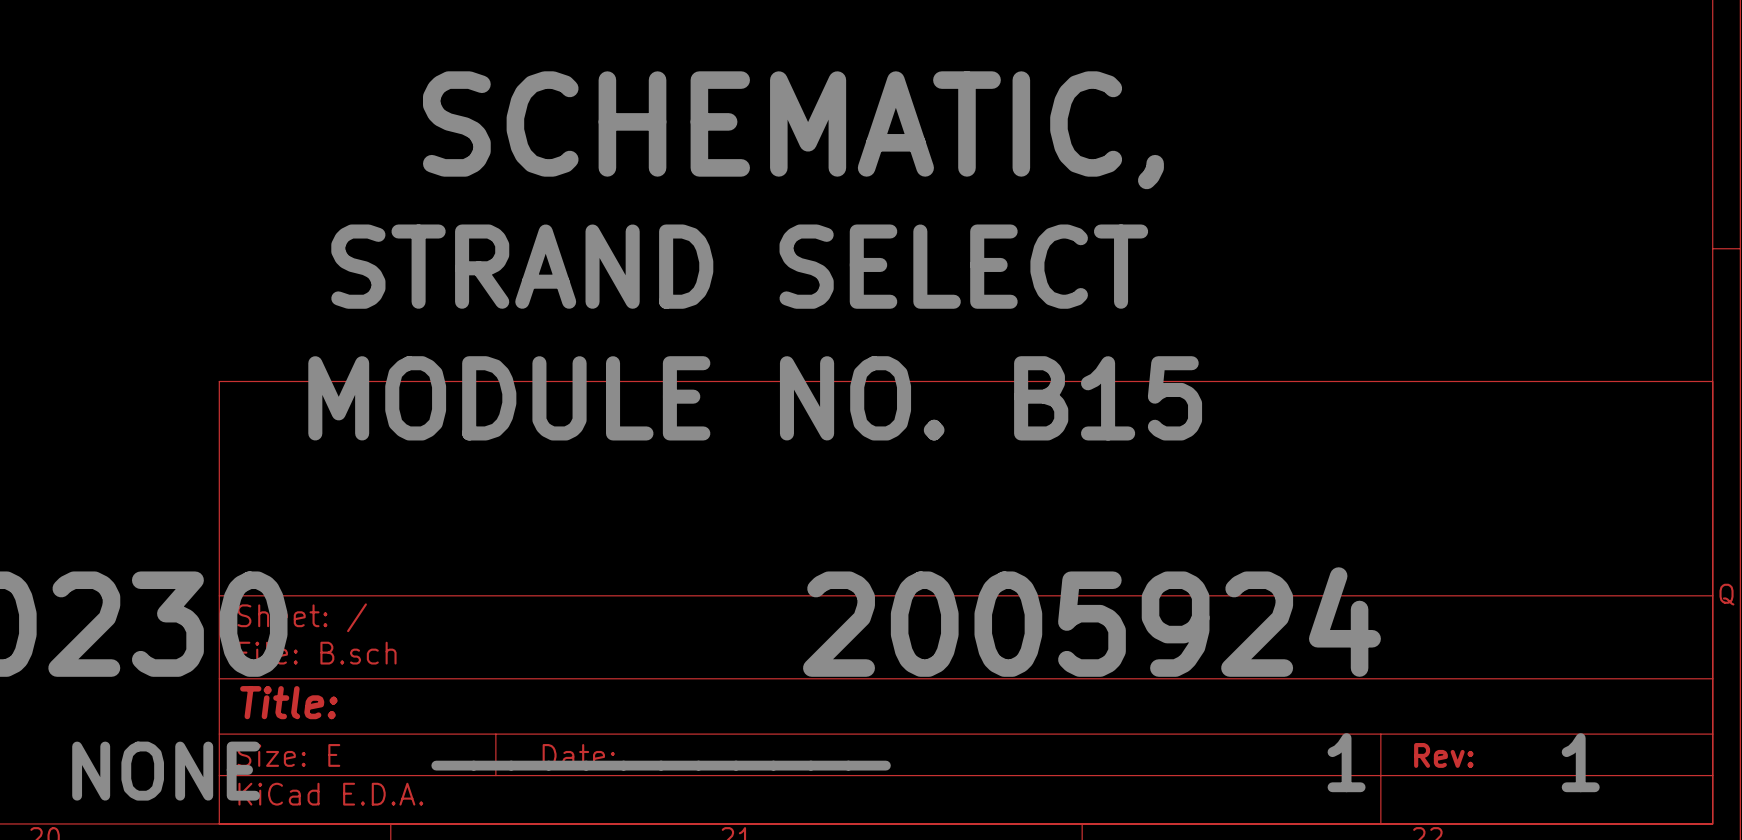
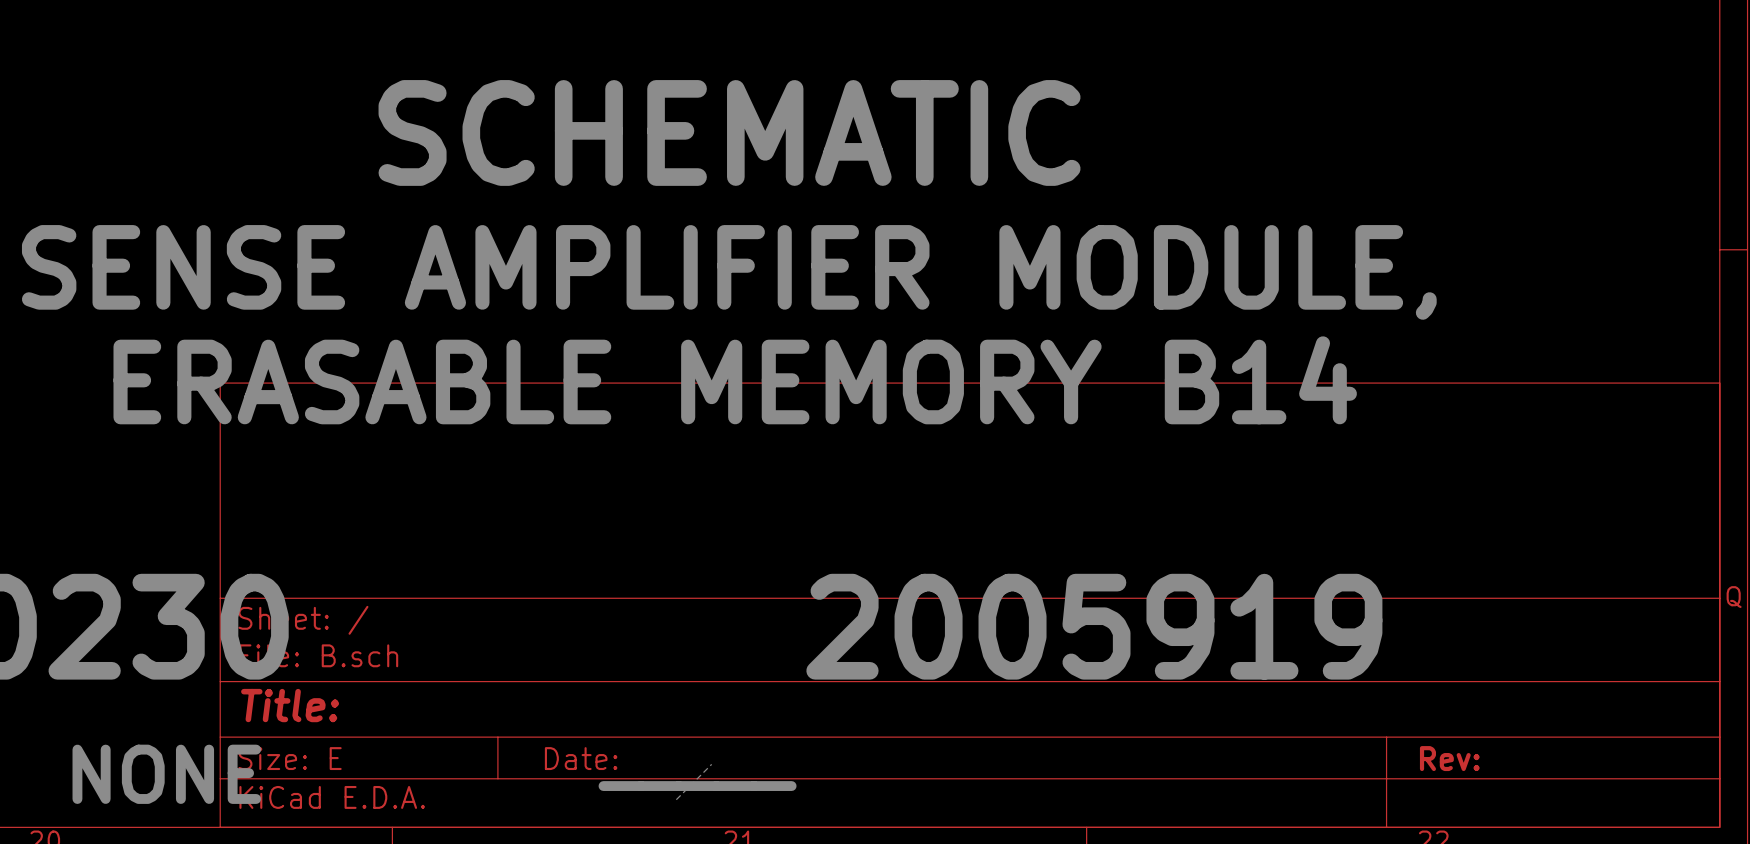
text: SCHEMATIC, (793, 130) -> SCHEMATIC (729, 132)
text: STRAND SELECT (739, 266) -> none
text: none -> SENSE AMPLIFIER MODULE, (729, 272)
text: none -> ERASABLE MEMORY B14 (735, 380)
text: MODULE NO. B15 (755, 398) -> none
text: 2005924 (1091, 622) -> 2005919 (1094, 626)
line: none -> (711, 764) (676, 799)
text: 1 1 (1463, 762) -> none
text: ____________ (661, 765) -> none
text: none -> _____ (697, 786)

